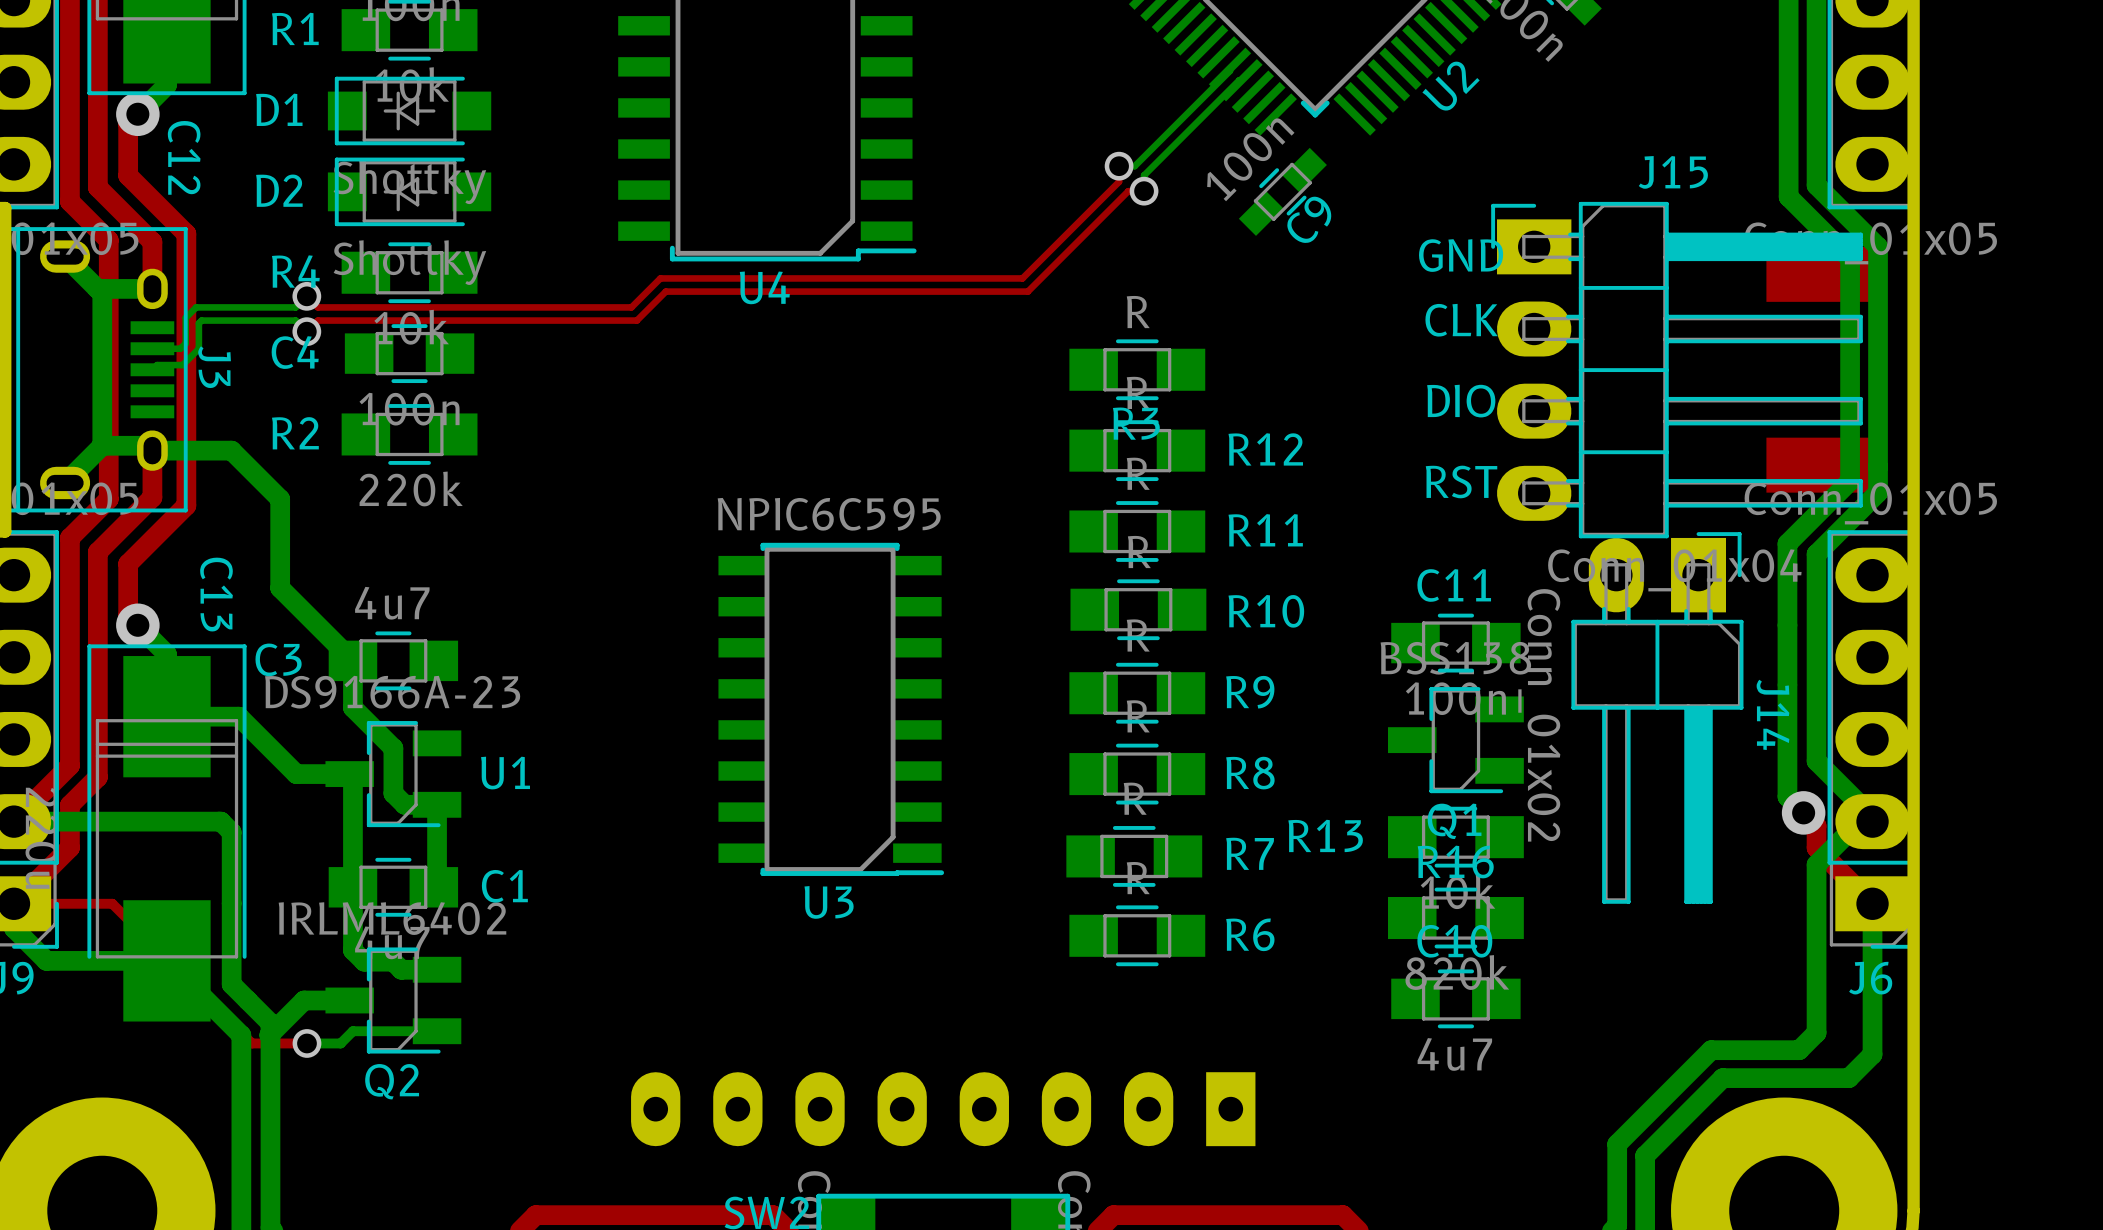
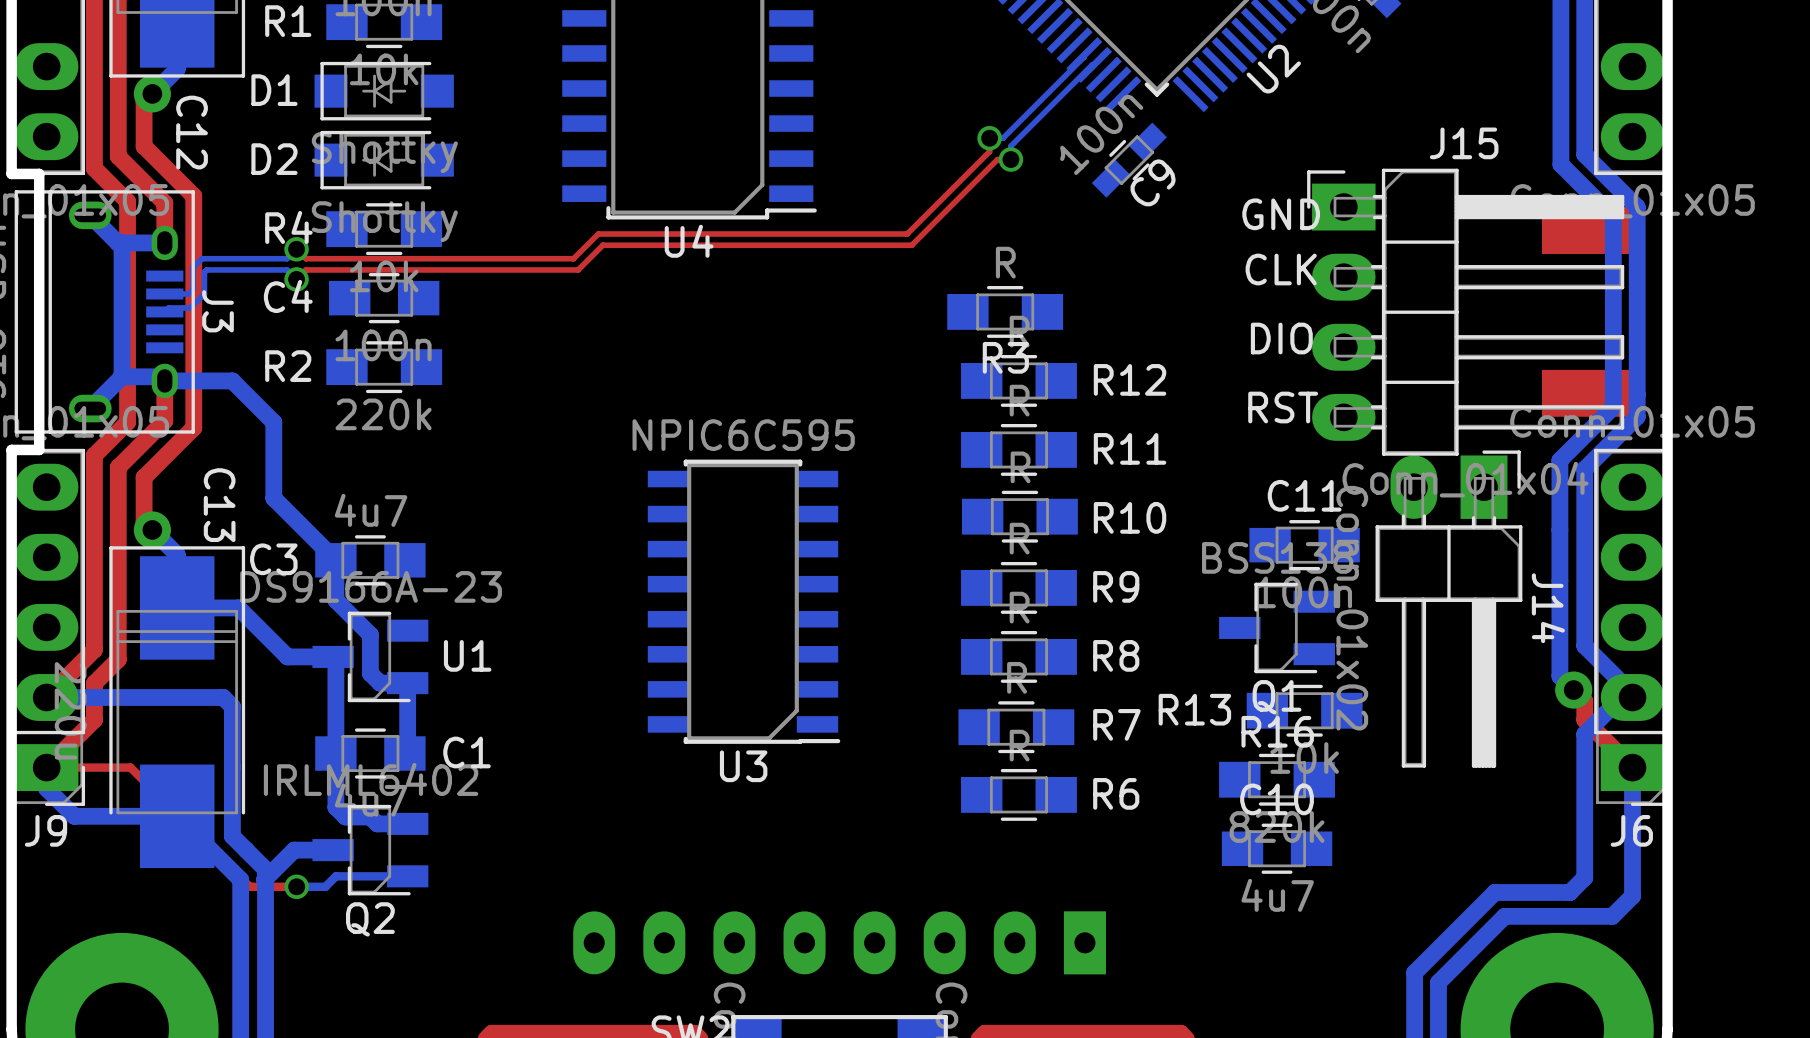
R12 position: (1137, 450) -> (1018, 380)
R11 position: (1137, 531) -> (1018, 449)
R10 position: (1138, 609) -> (1019, 516)
C11 position: (1455, 643) -> (1304, 545)
R9 position: (1137, 693) -> (1018, 587)
R8 position: (1137, 774) -> (1018, 656)
R13 position: (1455, 837) -> (1304, 710)
R7 position: (1134, 856) -> (1016, 727)
R6 position: (1137, 935) -> (1018, 794)

